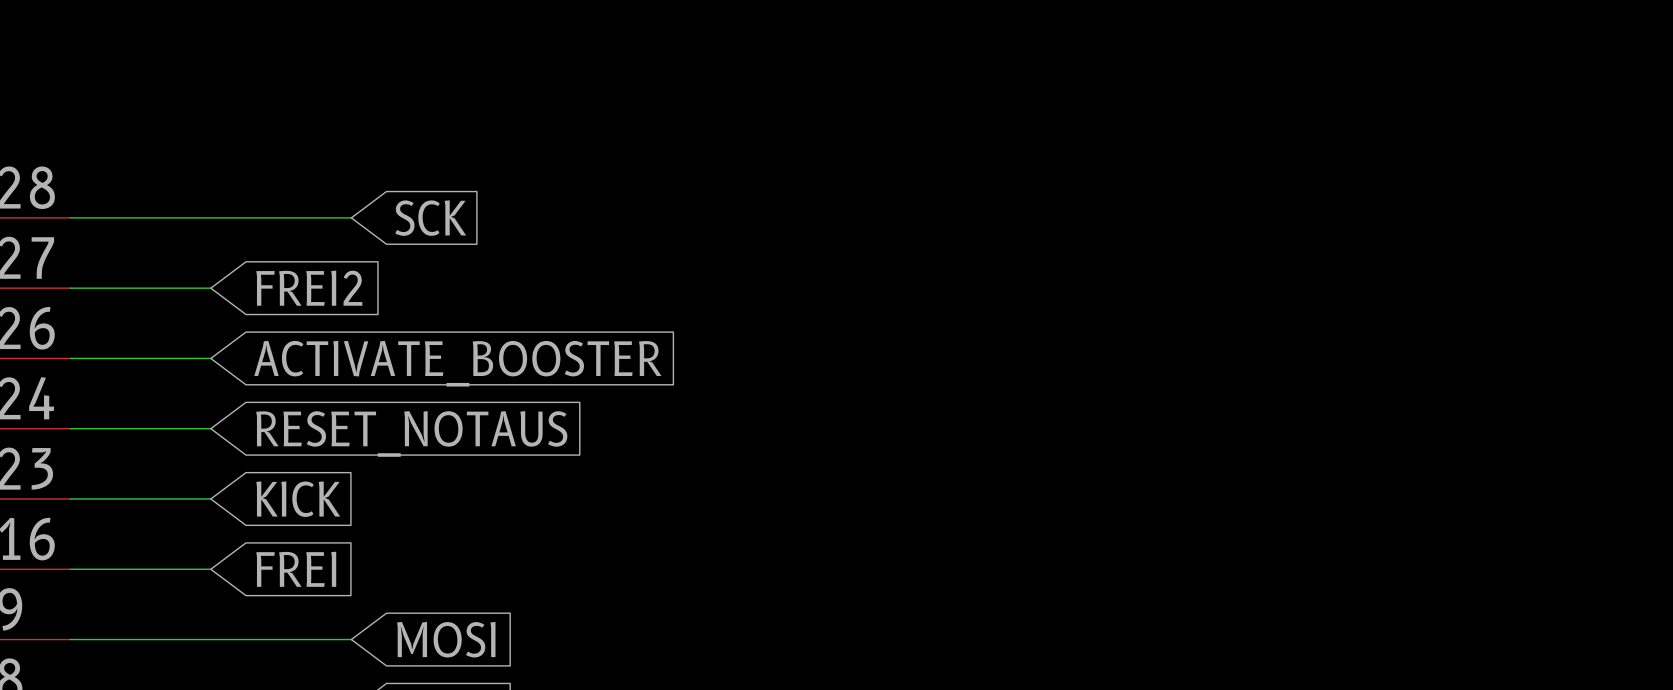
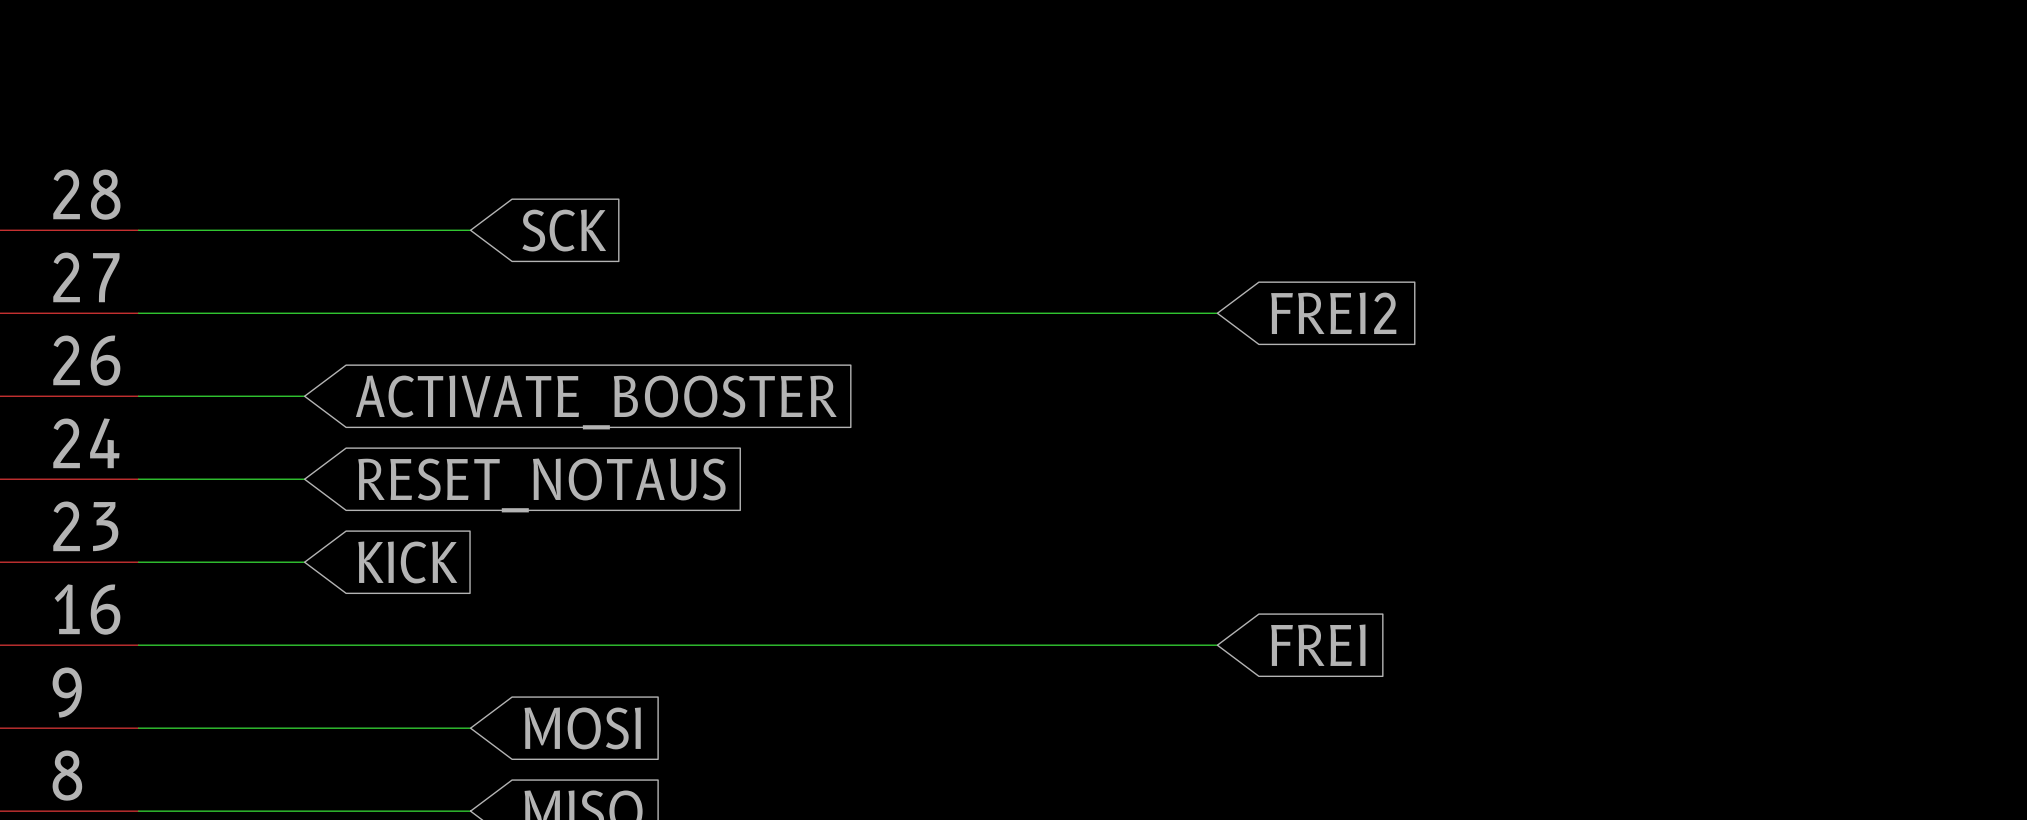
wire: none -> (304, 313) (1217, 313)
global label: FREI2 (309, 288) -> none
global label: none -> FREI2 (1333, 313)
wire: none -> (304, 645) (1217, 645)
global label: FREI (296, 569) -> none
global label: none -> FREI (1318, 645)

